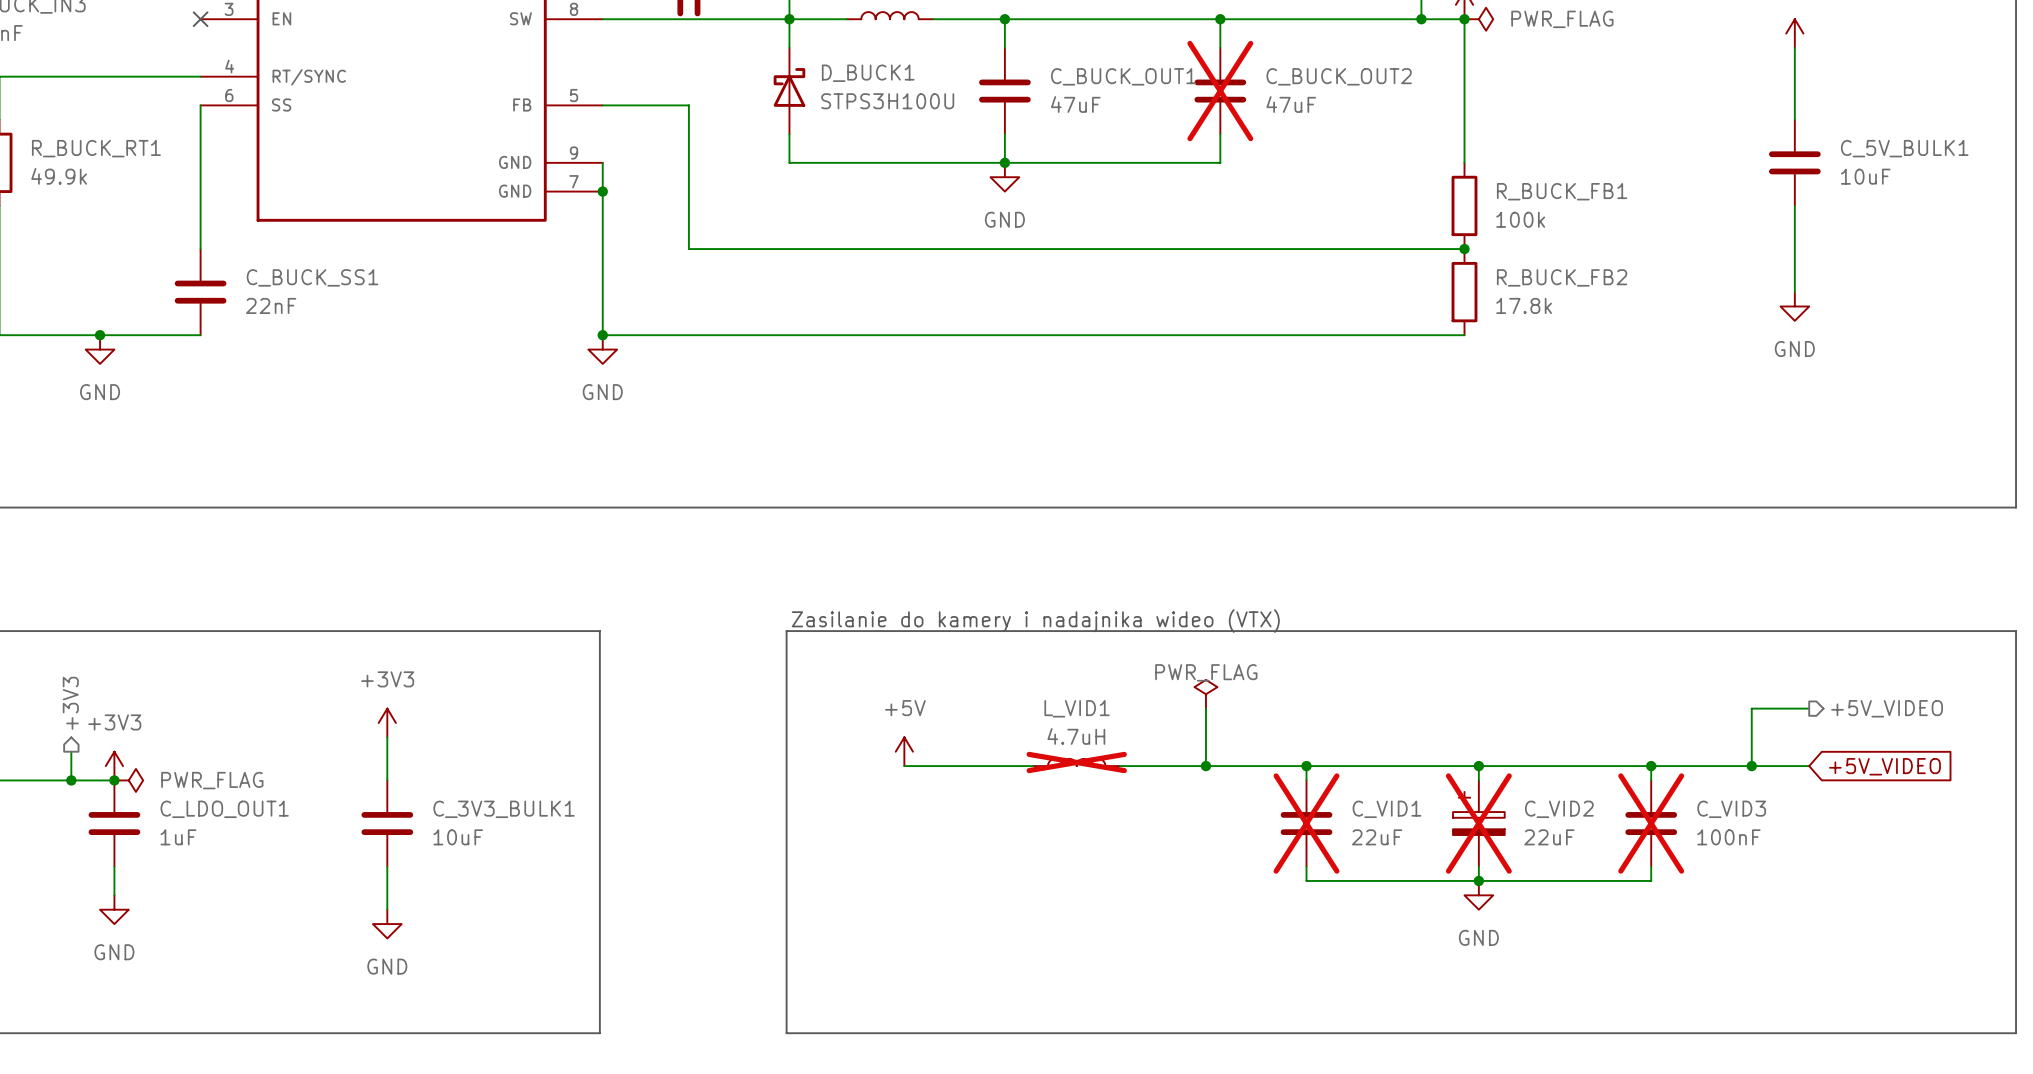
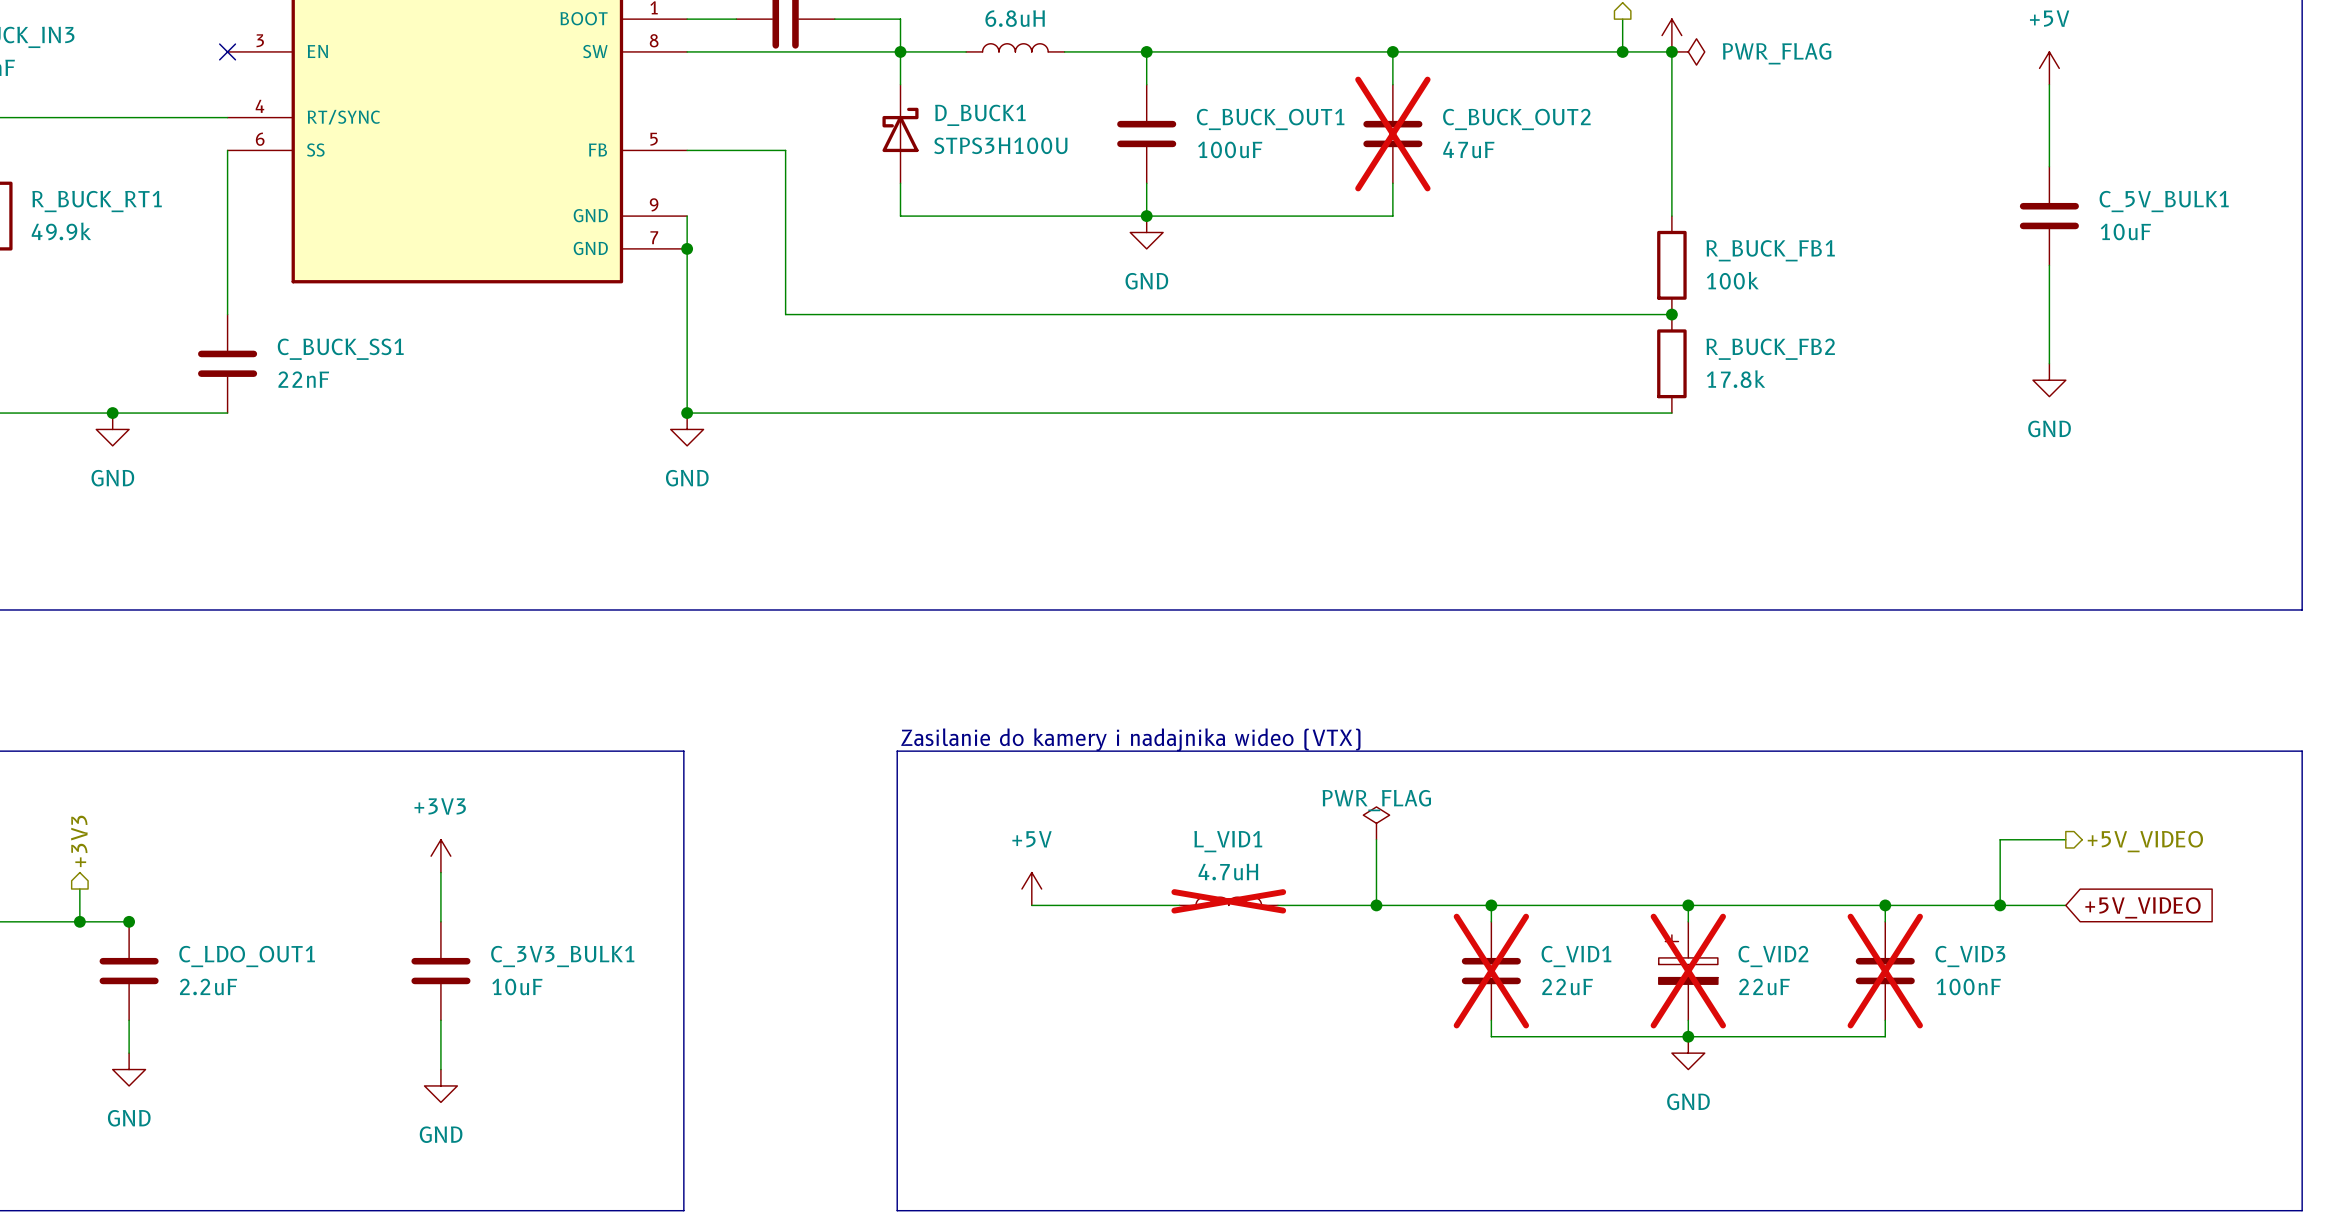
C_BUCK_OUT1 value: 47uF (1075, 104) -> 100uF (1230, 149)
power symbol: +3V3 (114, 766) -> none
power symbol: PWR_FLAG (128, 780) -> none
C_LDO_OUT1 value: 1uF (178, 837) -> 2.2uF (208, 986)

